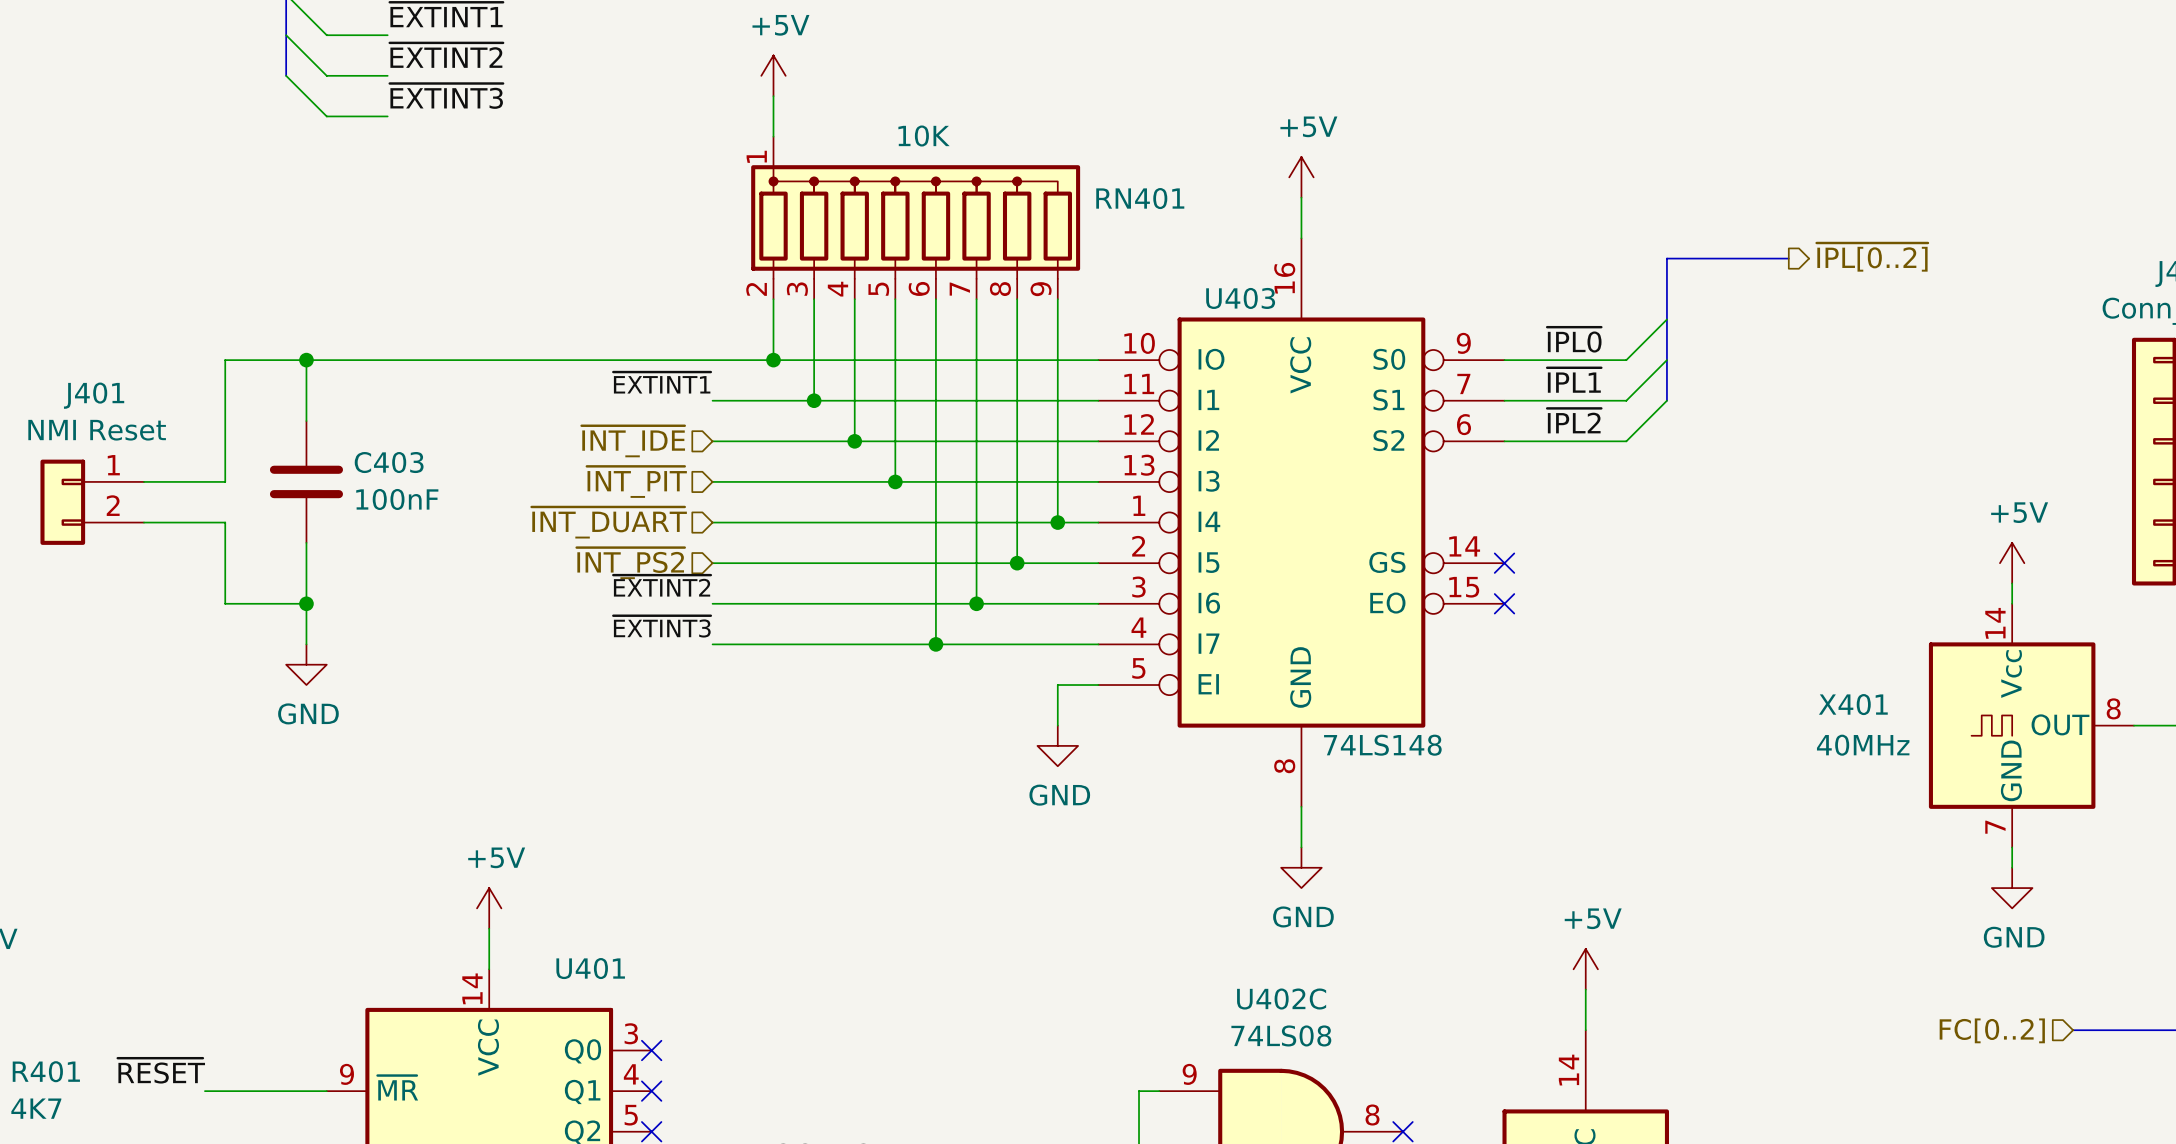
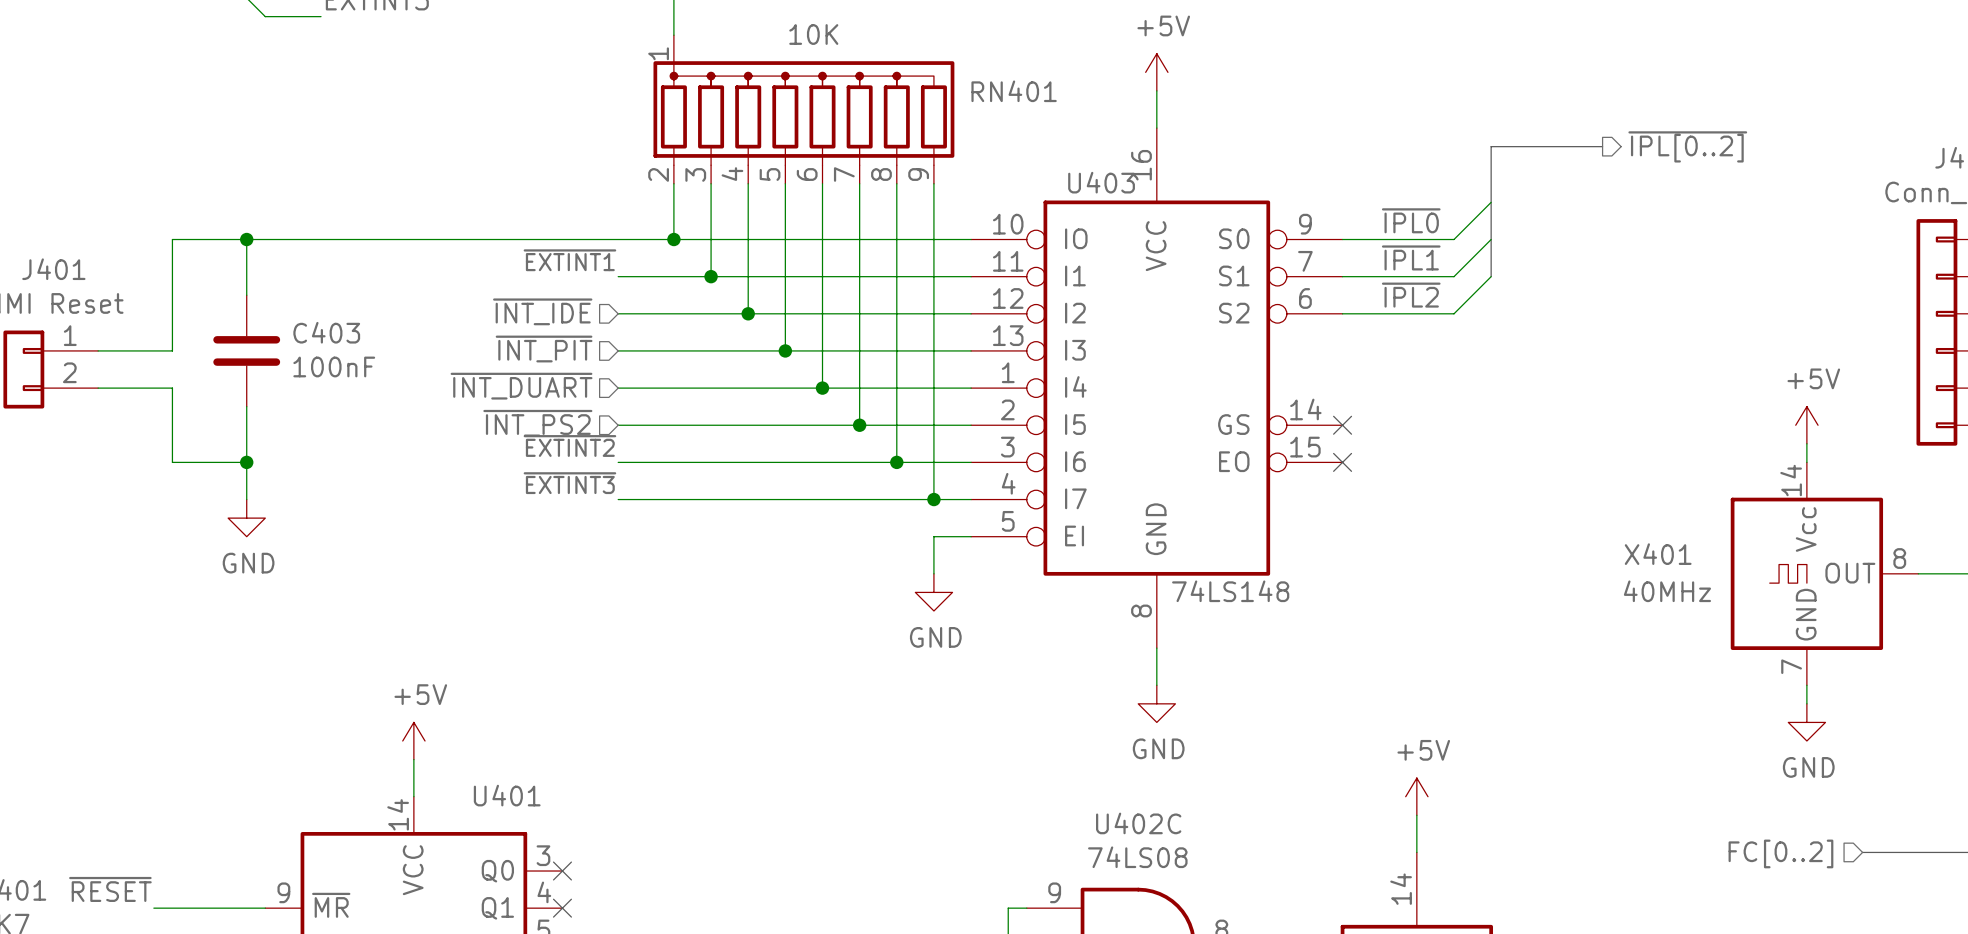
wire: (935, 522) (935, 644) -> (933, 388) (933, 499)
junction: none -> (822, 388)
junction: (1057, 522) -> none
wire: (976, 563) (976, 603) -> (896, 425) (896, 462)
junction: none -> (859, 425)
junction: (1017, 563) -> none
junction: (976, 603) -> none
junction: none -> (896, 462)
junction: (935, 644) -> none
junction: none -> (933, 499)

